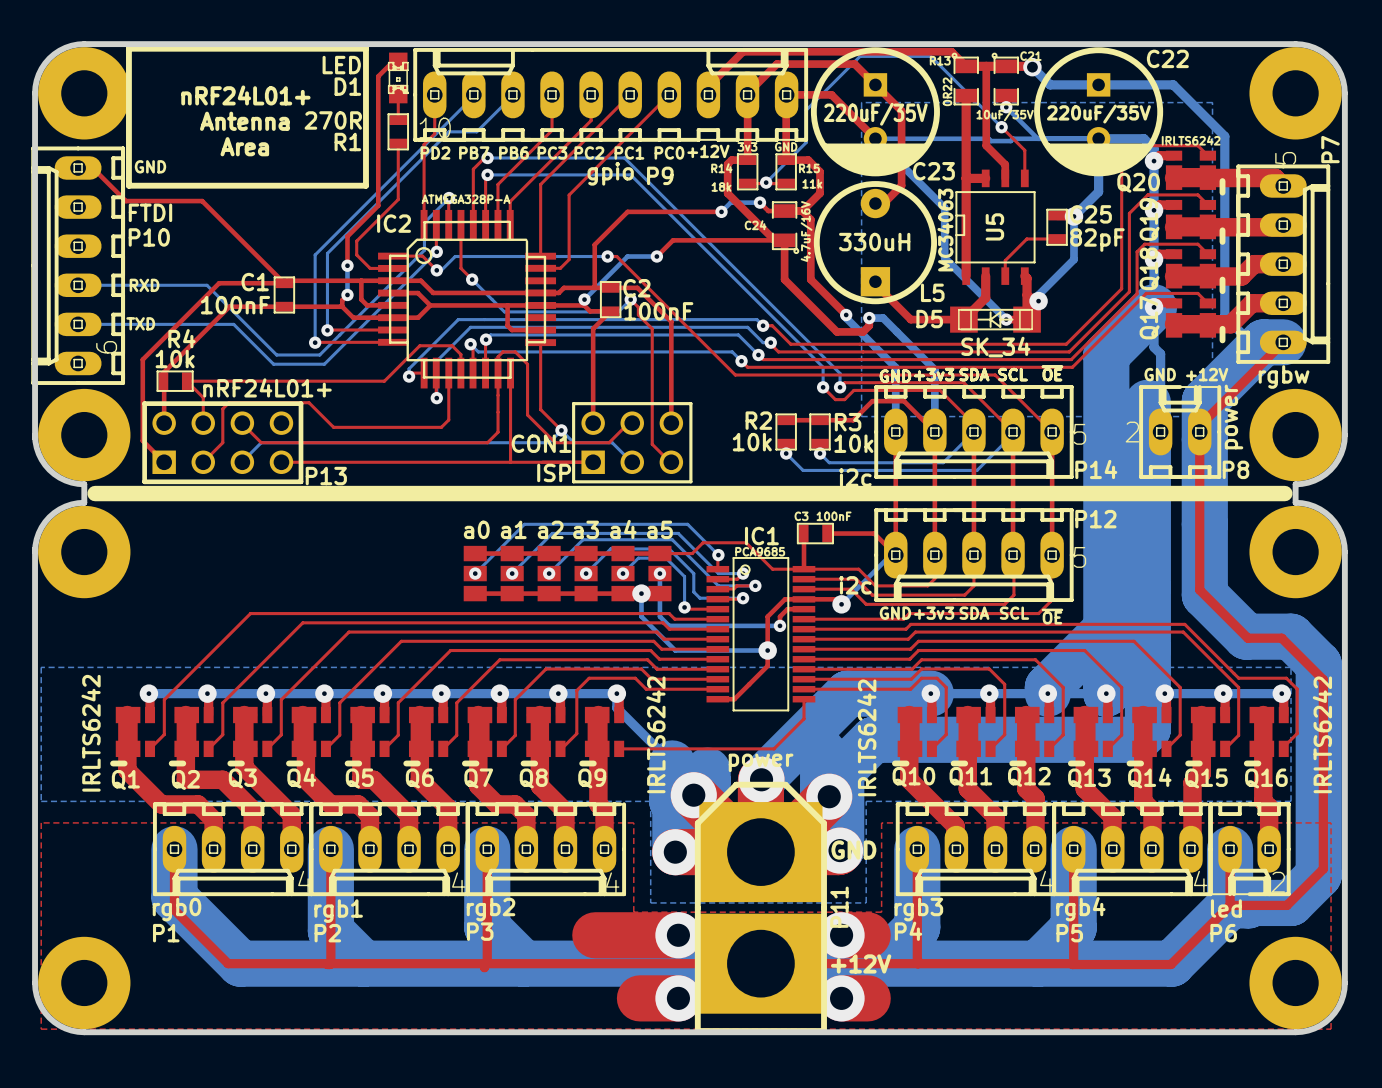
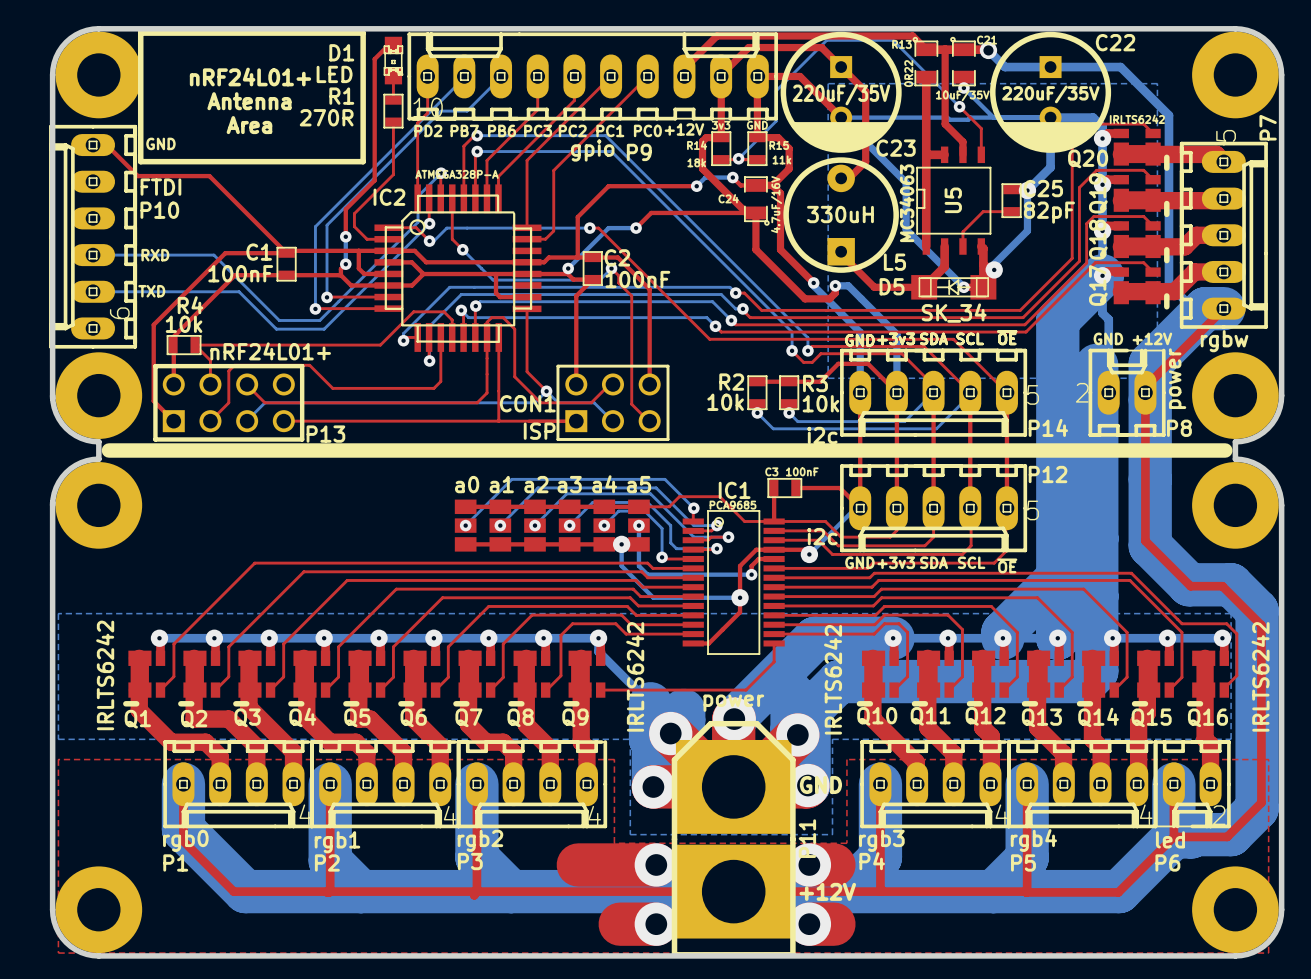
D1 value position: LED (341, 65) -> LED (334, 74)
D1 name position: D1 (347, 86) -> D1 (341, 52)
R1 value position: 270R (333, 120) -> 270R (326, 117)
R1 name position: R1 (347, 142) -> R1 (341, 96)

